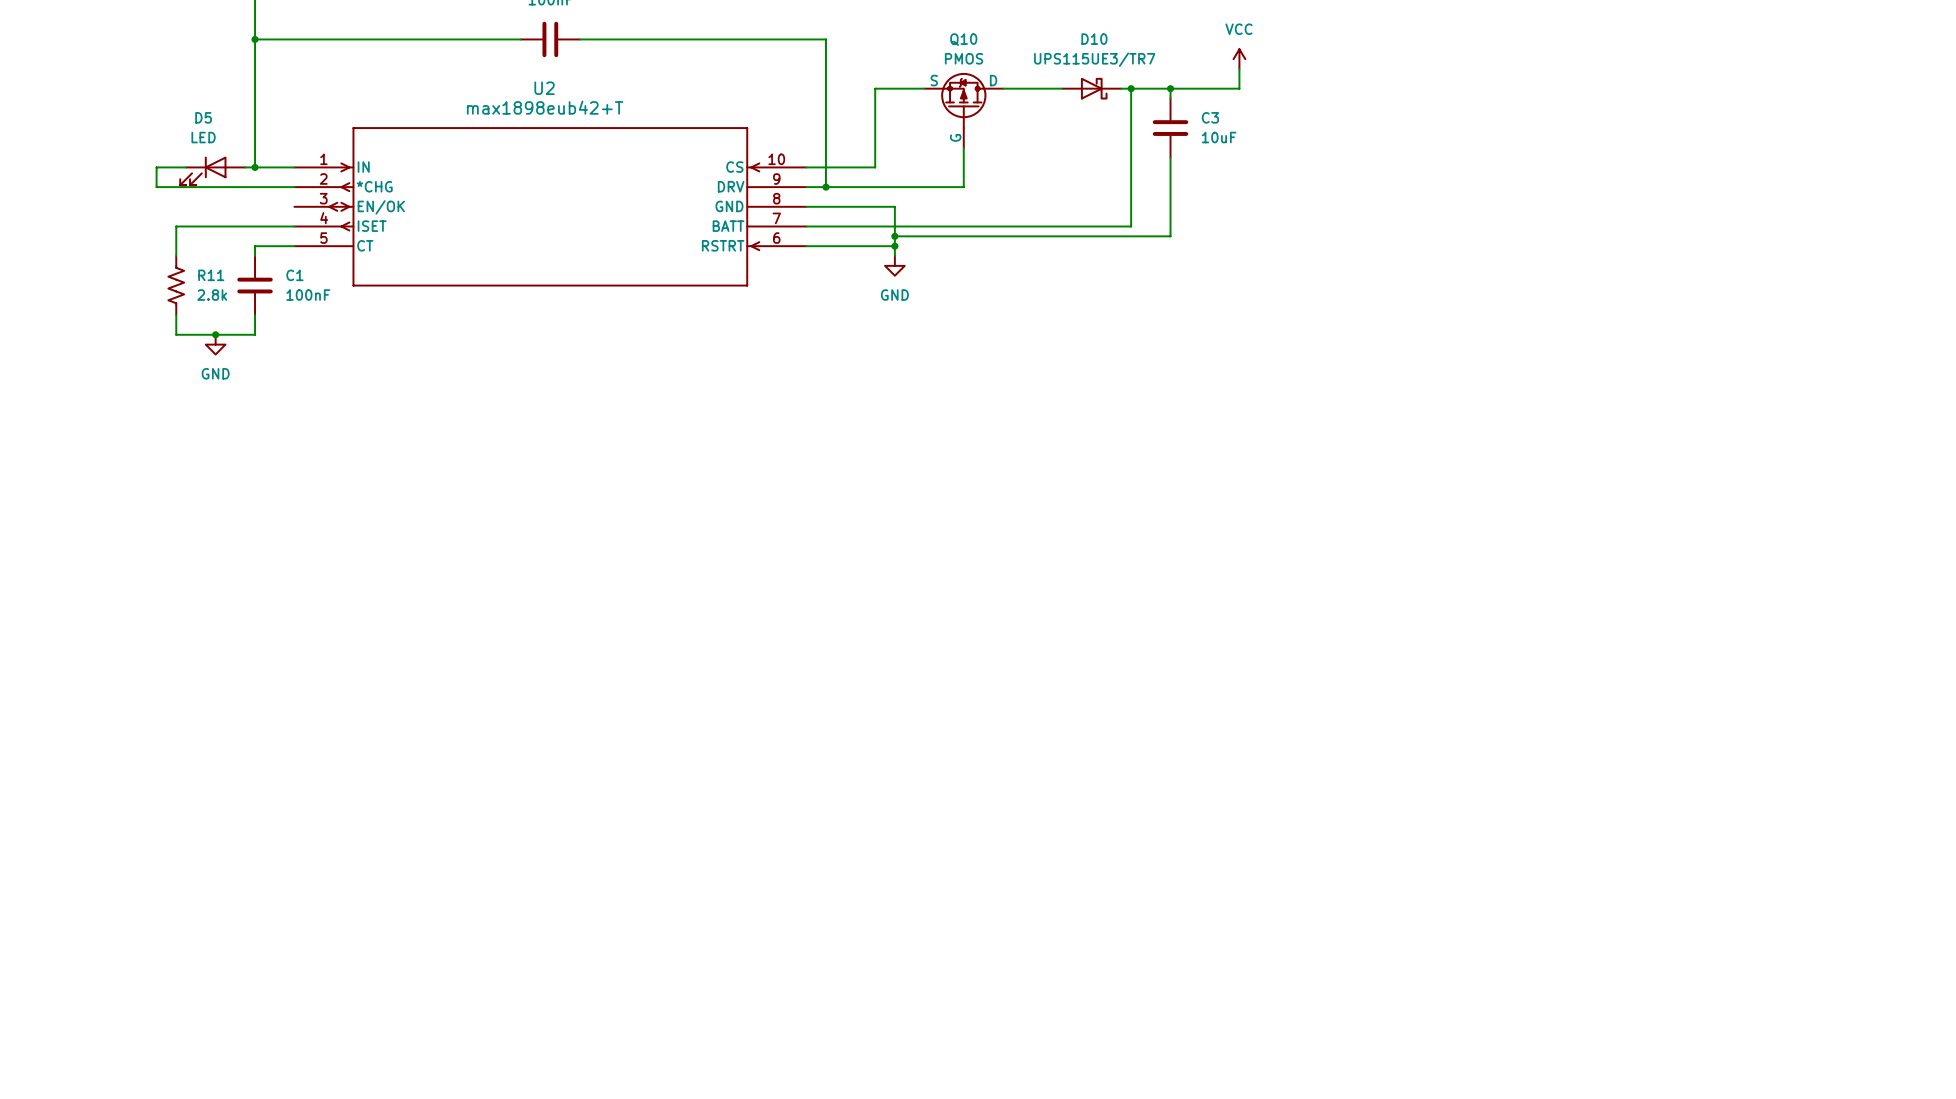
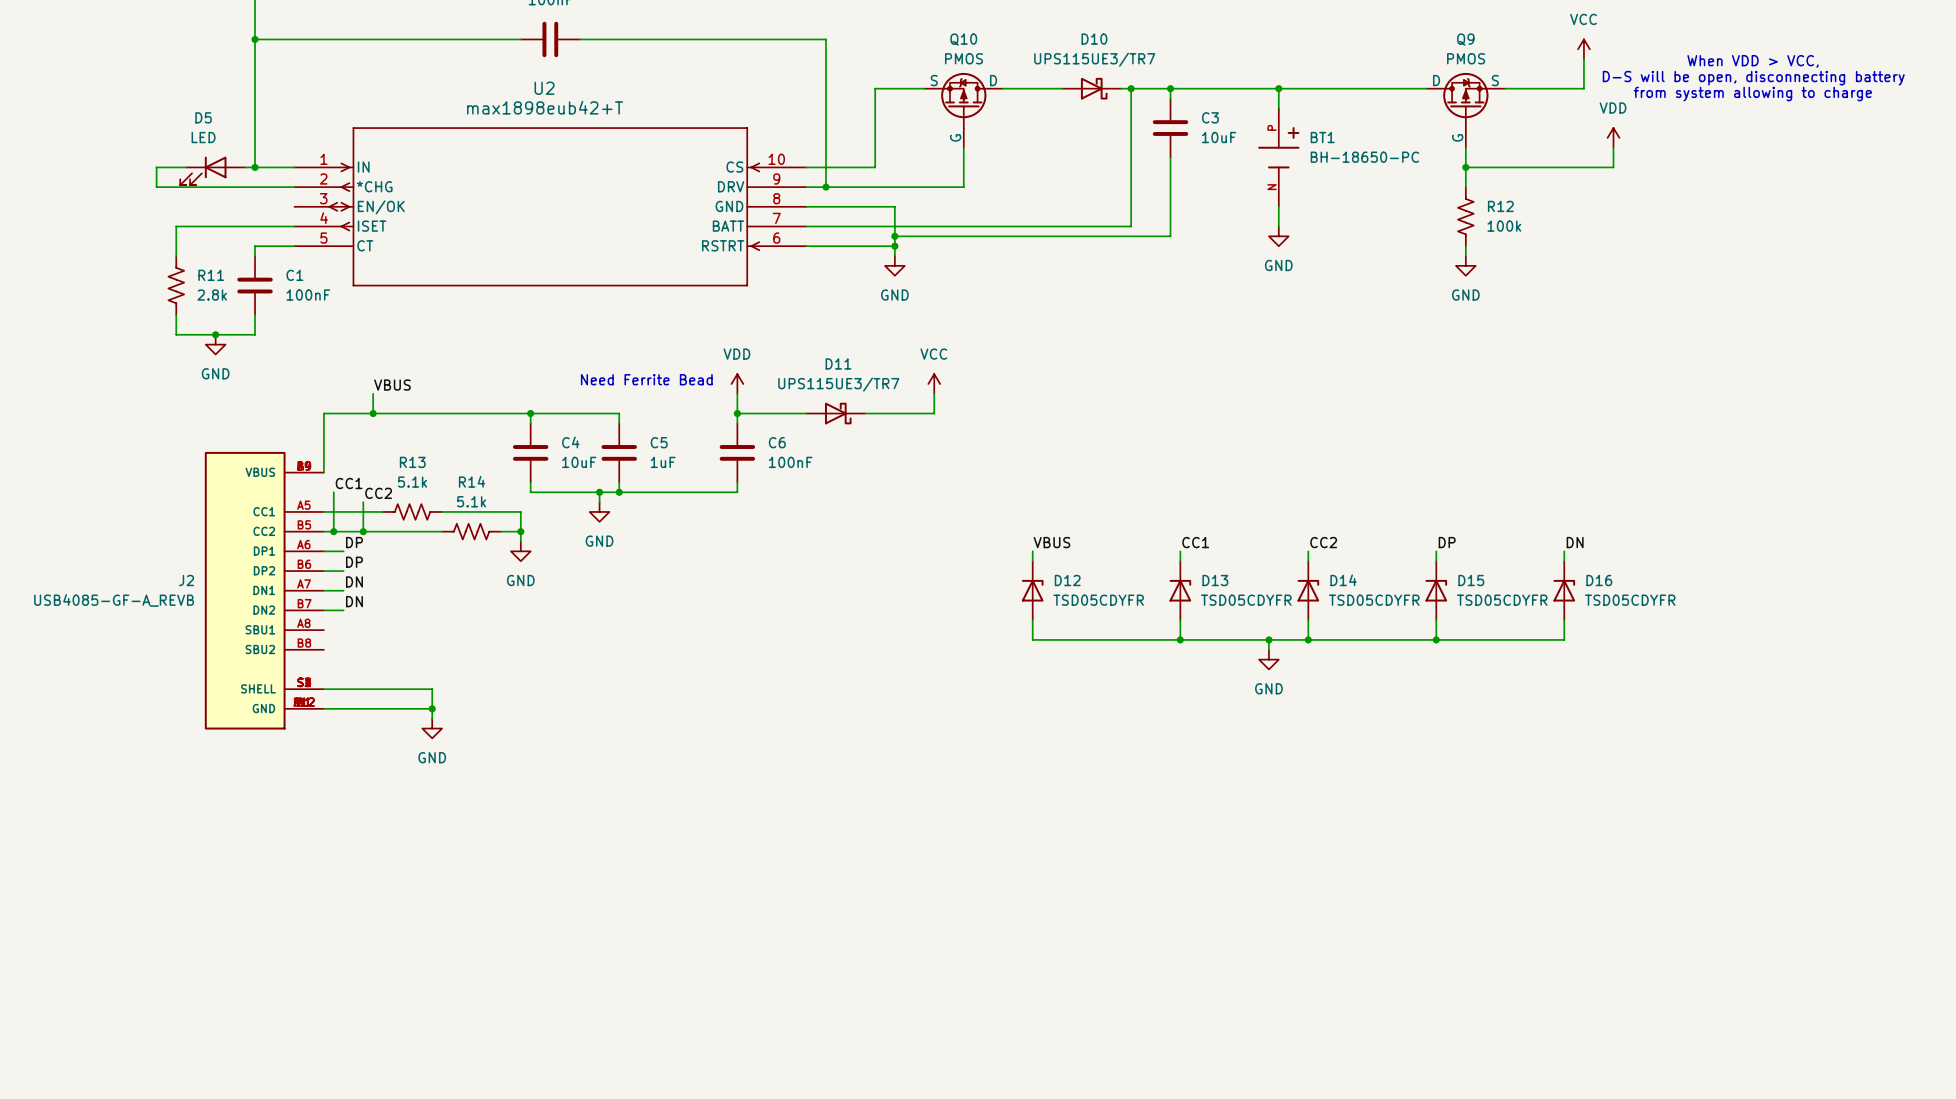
power symbol: none -> VCC (1583, 49)
power symbol: VCC (1239, 59) -> none
wire: none -> (1583, 59) (1583, 88) (1505, 88)
text: none -> When VDD > VCC, (1753, 61)
wire: (1239, 68) (1239, 88) -> (1426, 88) (1239, 88)
text: none -> D-S will be open, disconnecting battery (1753, 78)
wire: none -> (1278, 88) (1278, 108)
junction: none -> (1278, 88)
text: none -> from system allowing to charge (1752, 94)
Q9: none -> PMOS (1465, 110)
power symbol: none -> VDD (1613, 137)
wire: none -> (1465, 147) (1465, 187)
wire: none -> (1613, 147) (1613, 167) (1465, 167)
BT1: none -> BH-18650-PC (1278, 157)
junction: none -> (1465, 167)
wire: none -> (1278, 206) (1278, 226)
R12: none -> 100k (1465, 216)
power symbol: none -> GND (1278, 236)
wire: none -> (1465, 246) (1465, 256)
power symbol: none -> GND (1465, 265)
text: none -> Need Ferrite Bead (646, 379)
power symbol: none -> VDD (737, 384)
power symbol: none -> VCC (934, 384)
label: none -> VBUS (392, 385)
wire: none -> (373, 393) (373, 413)
wire: none -> (737, 393) (737, 423)
wire: none -> (934, 393) (934, 413) (865, 413)
junction: none -> (373, 413)
wire: none -> (530, 413) (530, 423)
junction: none -> (530, 413)
wire: none -> (737, 413) (806, 413)
junction: none -> (737, 413)
D11: none -> UPS115UE3/TR7 (835, 413)
wire: none -> (619, 423) (619, 413) (323, 413) (323, 472)
C4: none -> 10uF (530, 452)
C5: none -> 1uF (619, 452)
C6: none -> 100nF (737, 452)
wire: none -> (530, 482) (530, 492) (737, 492) (737, 482)
wire: none -> (619, 482) (619, 492)
label: none -> CC1 (349, 483)
wire: none -> (333, 492) (333, 531)
wire: none -> (599, 492) (599, 502)
junction: none -> (599, 492)
junction: none -> (619, 492)
label: none -> CC2 (378, 493)
wire: none -> (363, 502) (363, 531)
wire: none -> (323, 511) (382, 511)
R13: none -> 5.1k (412, 511)
wire: none -> (442, 511) (520, 511) (520, 541)
power symbol: none -> GND (599, 511)
wire: none -> (323, 531) (442, 531)
junction: none -> (333, 531)
junction: none -> (363, 531)
R14: none -> 5.1k (471, 531)
wire: none -> (501, 531) (520, 531)
junction: none -> (520, 531)
label: none -> DP (354, 542)
label: none -> VBUS (1051, 542)
label: none -> CC1 (1195, 542)
label: none -> CC2 (1323, 542)
label: none -> DP (1447, 542)
label: none -> DN (1575, 542)
wire: none -> (323, 551) (343, 551)
power symbol: none -> GND (520, 551)
wire: none -> (1032, 551) (1032, 561)
wire: none -> (1180, 551) (1180, 561)
wire: none -> (1308, 551) (1308, 561)
wire: none -> (1436, 551) (1436, 561)
wire: none -> (1564, 551) (1564, 561)
label: none -> DP (354, 562)
wire: none -> (323, 571) (343, 571)
label: none -> DN (354, 581)
J2: none -> USB4085-GF-A_REVB (264, 590)
wire: none -> (323, 590) (343, 590)
D12: none -> TSD05CDYFR (1032, 590)
D13: none -> TSD05CDYFR (1180, 590)
D14: none -> TSD05CDYFR (1308, 590)
D15: none -> TSD05CDYFR (1436, 590)
D16: none -> TSD05CDYFR (1564, 590)
label: none -> DN (354, 601)
wire: none -> (323, 610) (343, 610)
wire: none -> (1032, 620) (1032, 639) (1564, 639) (1564, 620)
wire: none -> (1180, 620) (1180, 639)
wire: none -> (1308, 620) (1308, 639)
wire: none -> (1436, 620) (1436, 639)
junction: none -> (1180, 639)
wire: none -> (1268, 639) (1268, 649)
junction: none -> (1268, 639)
junction: none -> (1308, 639)
junction: none -> (1436, 639)
power symbol: none -> GND (1268, 659)
wire: none -> (323, 689) (432, 689) (432, 718)
wire: none -> (323, 708) (432, 708)
junction: none -> (432, 708)
power symbol: none -> GND (432, 728)

